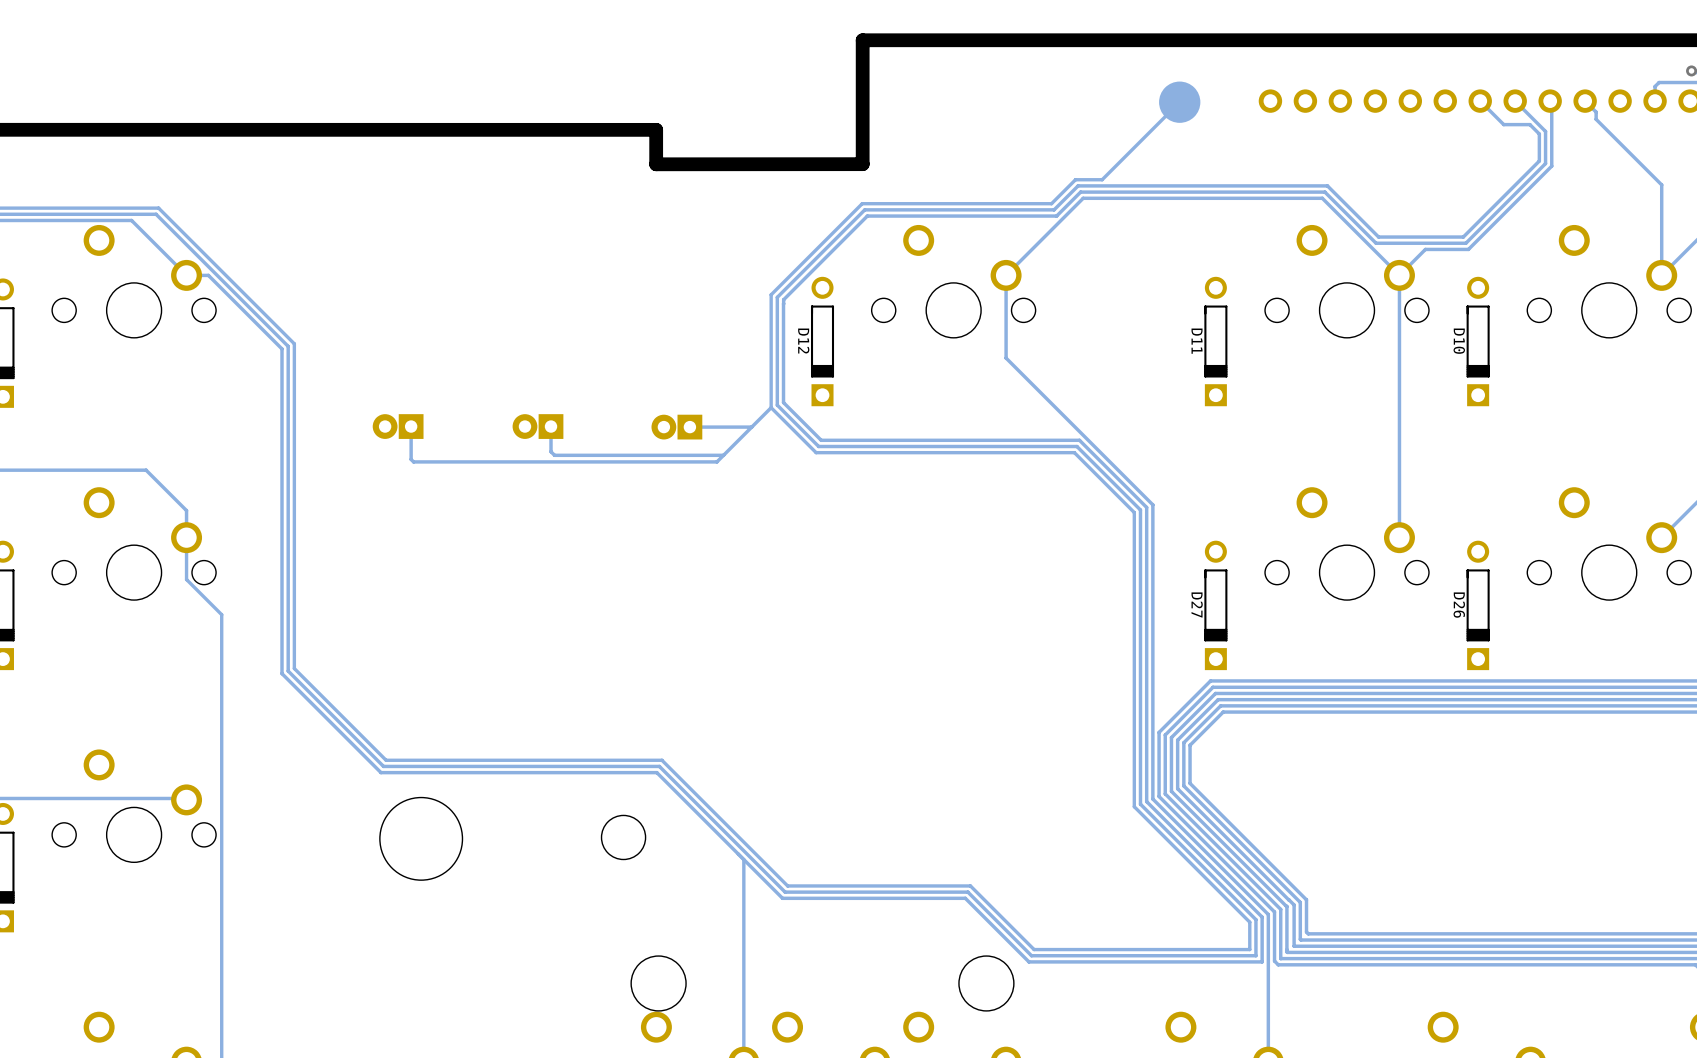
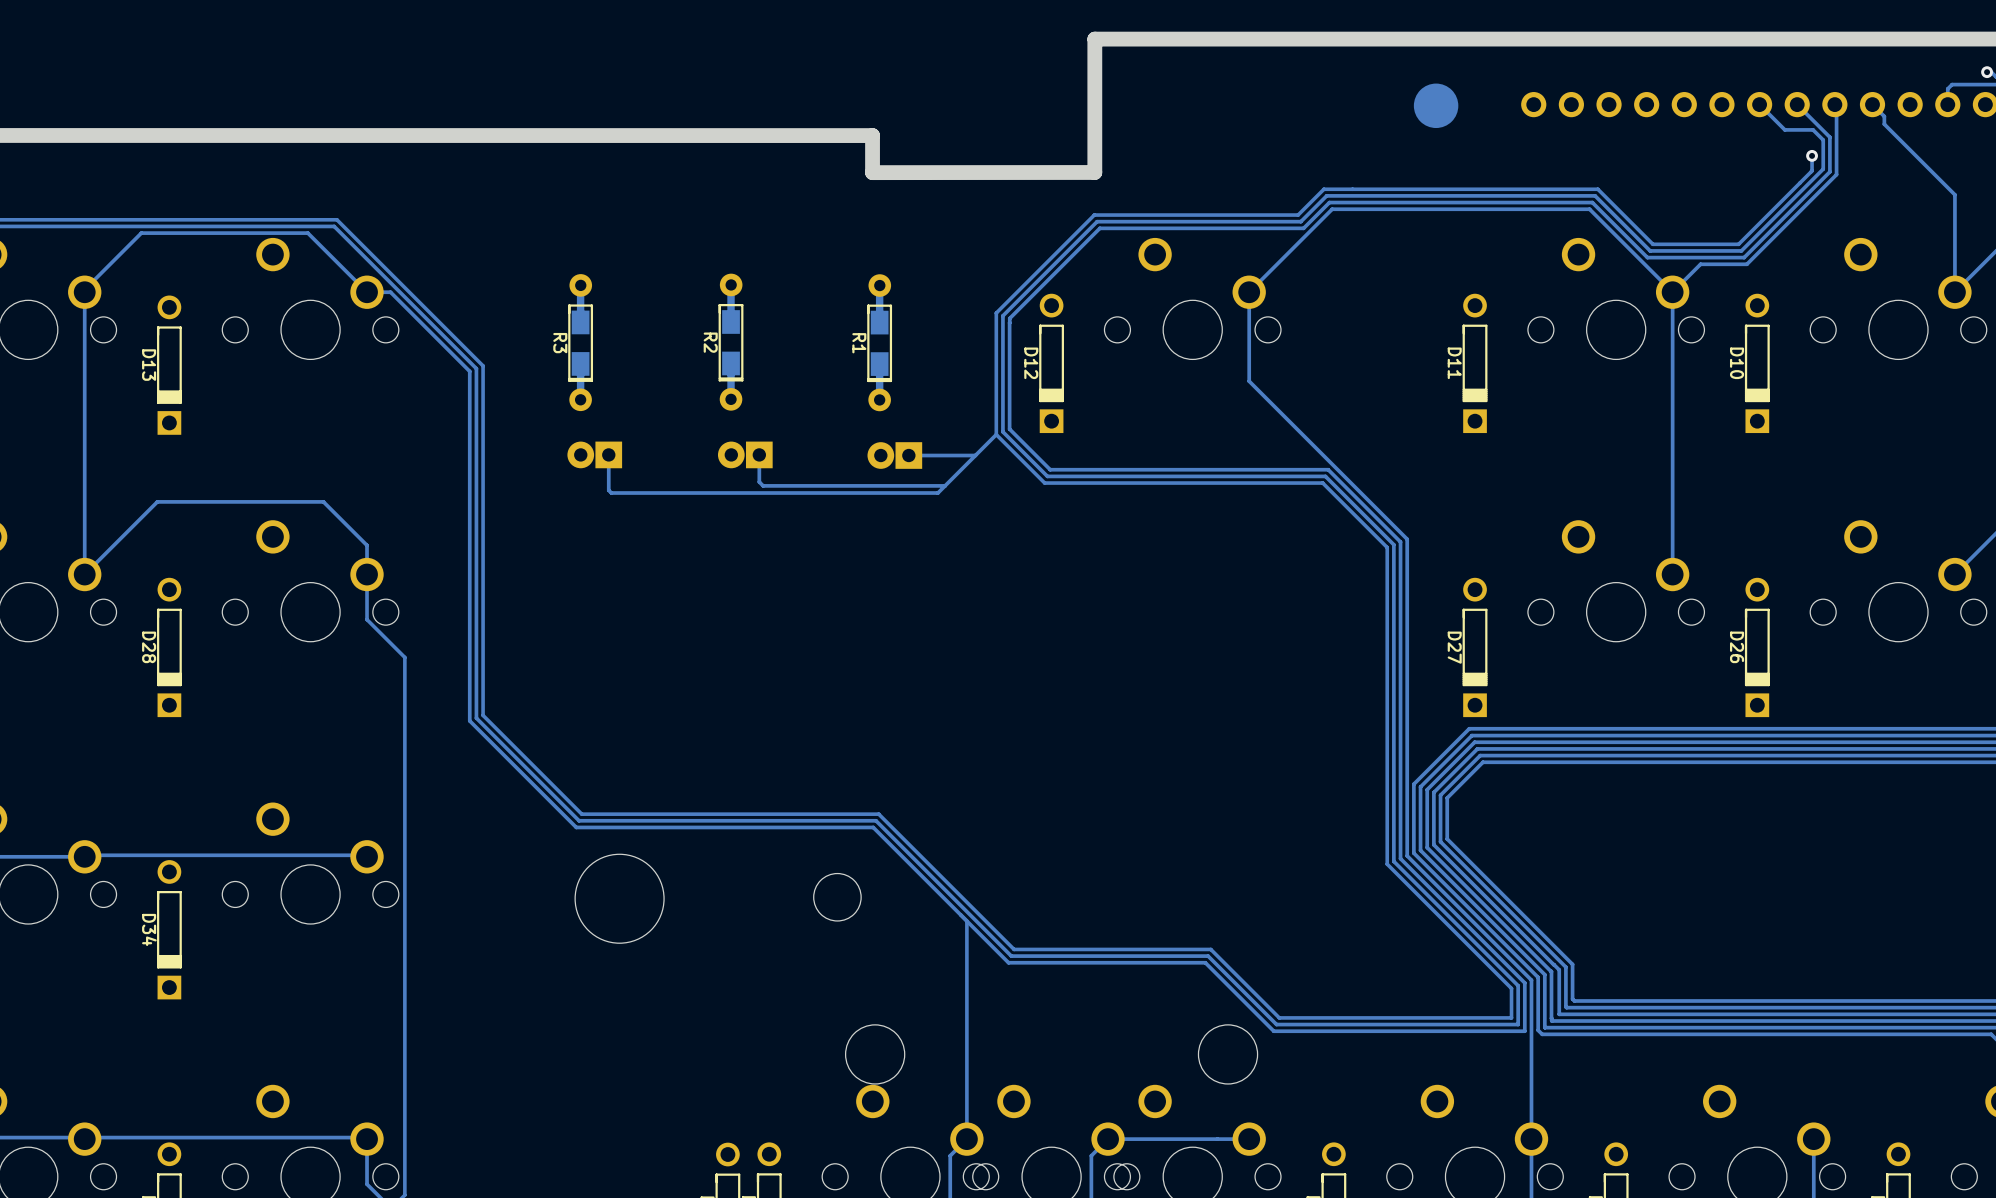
track: (1179, 102) (1102, 179) -> (1812, 155) (1812, 170) (1738, 244) (1652, 244) (1597, 189) (1352, 189)
via: none -> (1812, 155)
R2: none -> (731, 342)
R3: none -> (580, 342)
R1: none -> (879, 342)

